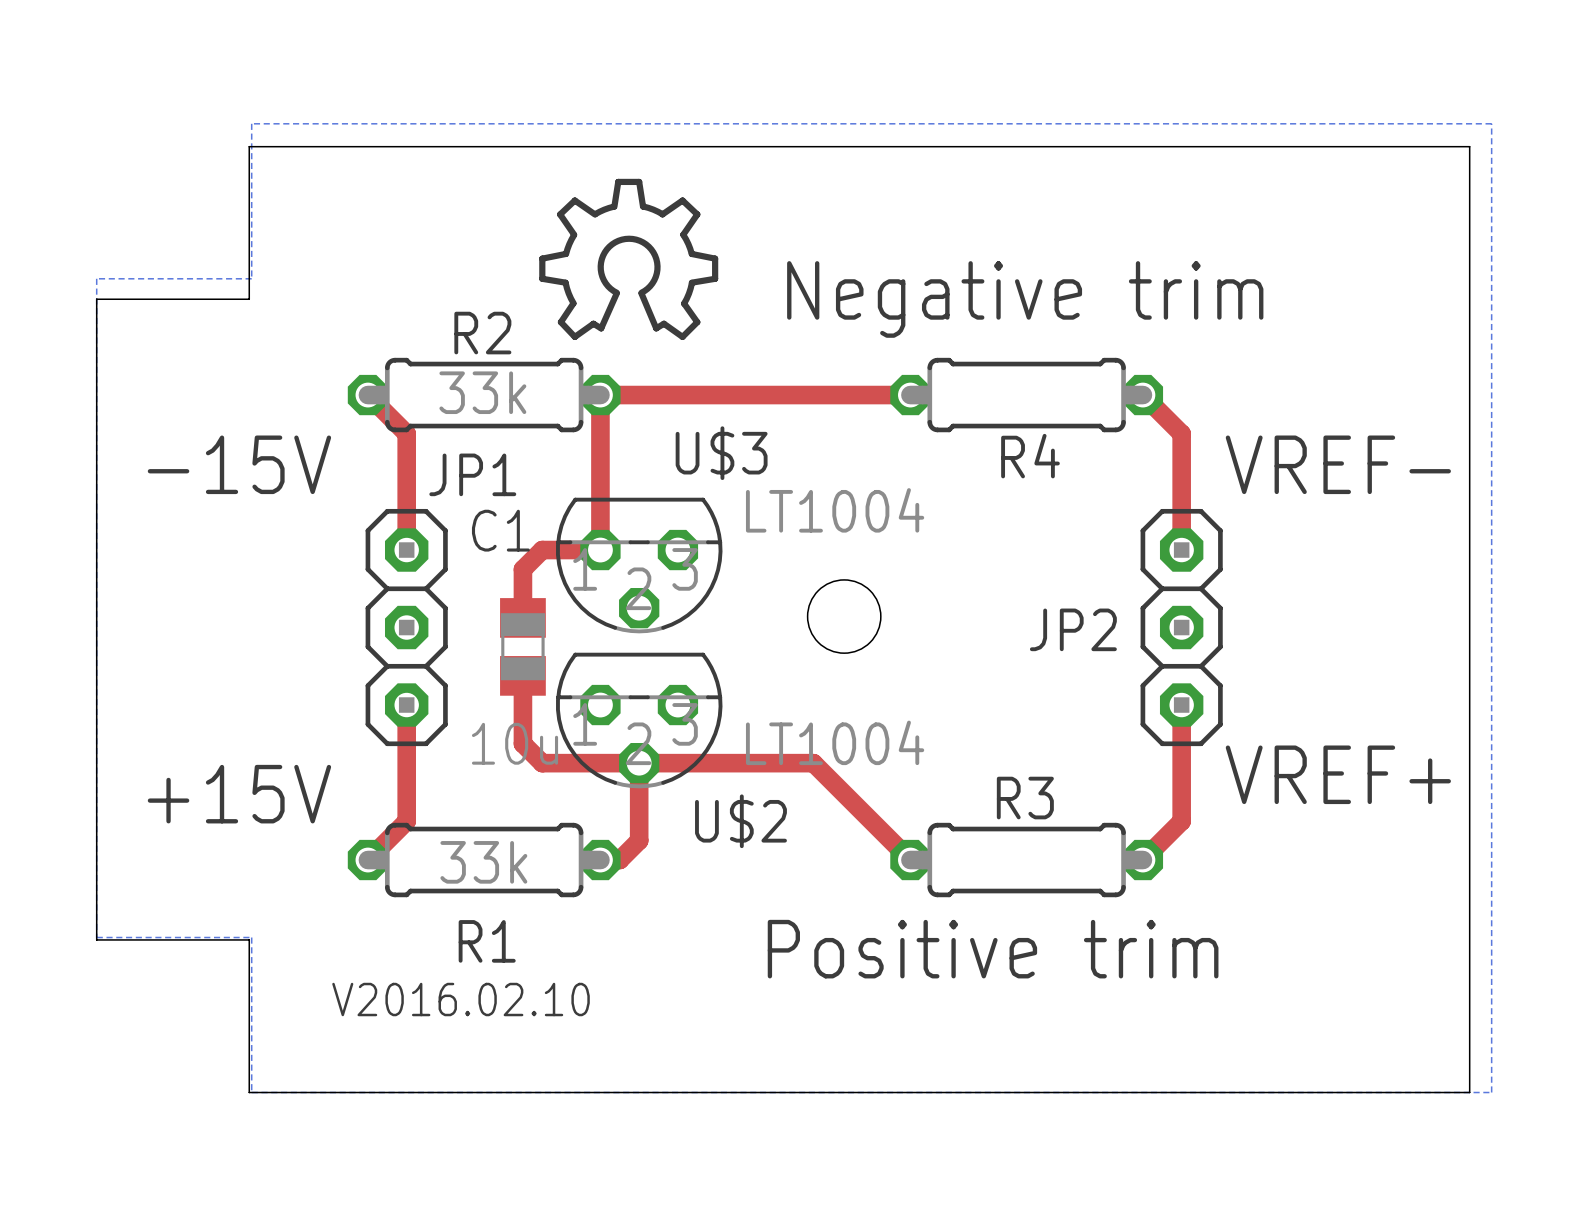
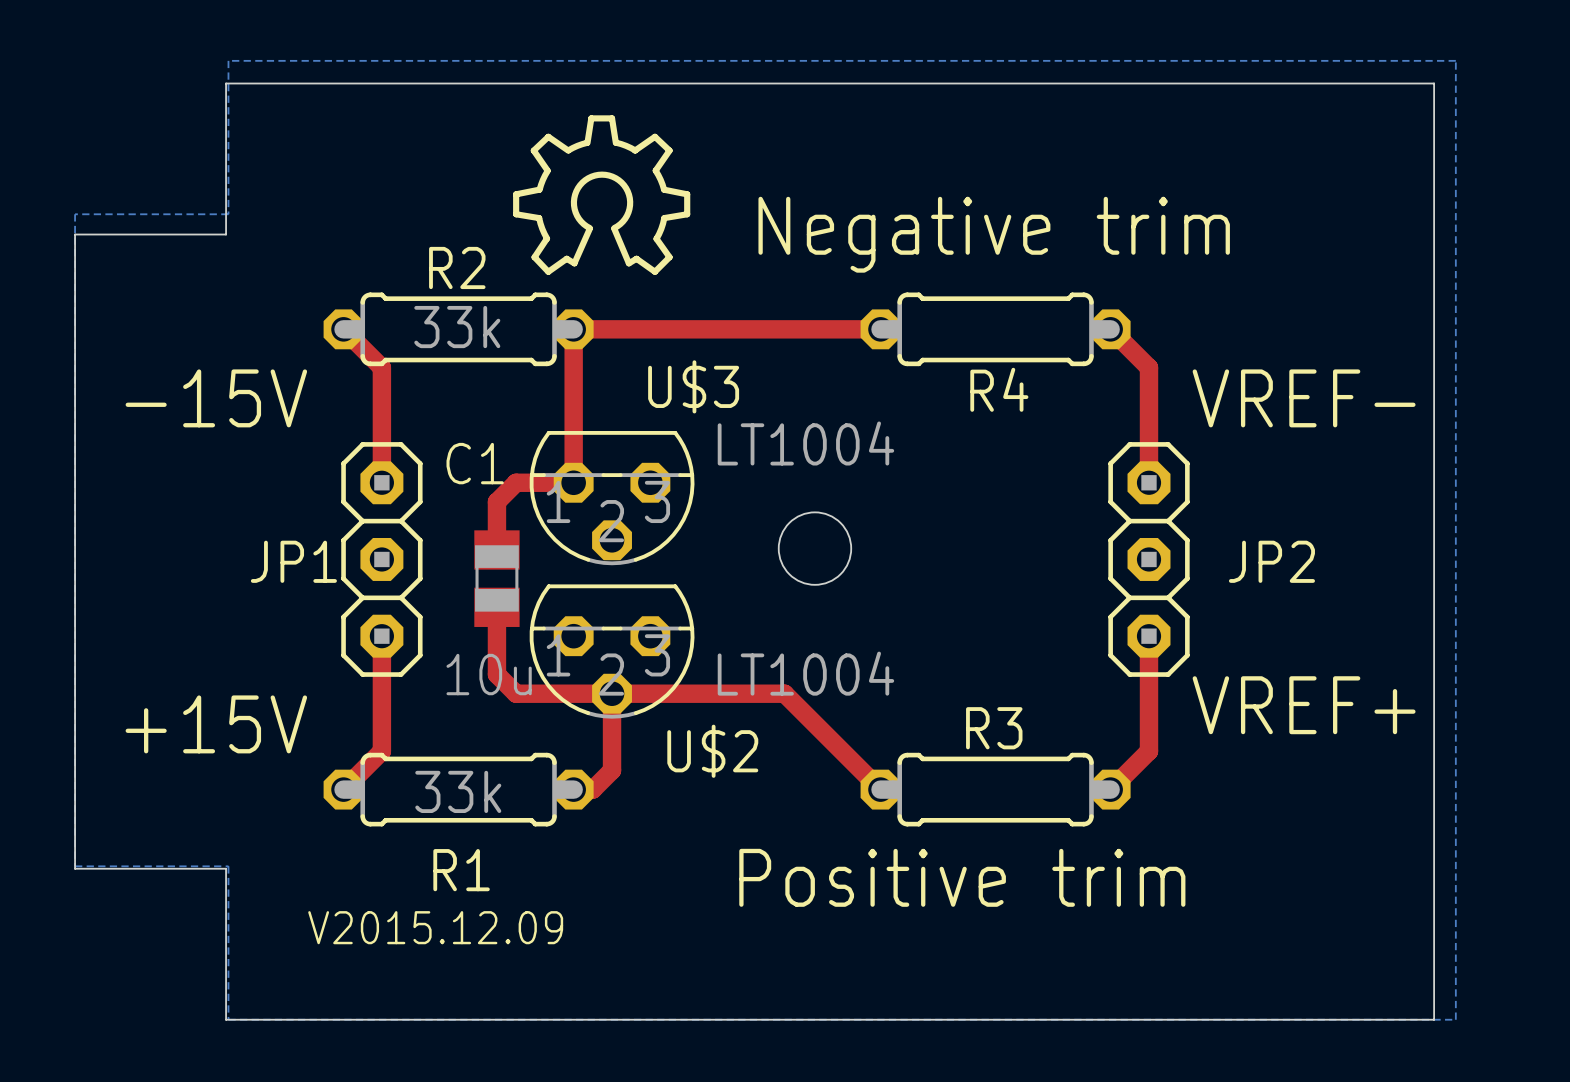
JP1 name position: JP1 (472, 474) -> JP1 (293, 561)
JP2 name position: JP2 (1073, 629) -> JP2 (1271, 561)
text: V2016.02.10 (461, 999) -> V2015.12.09 (435, 927)

